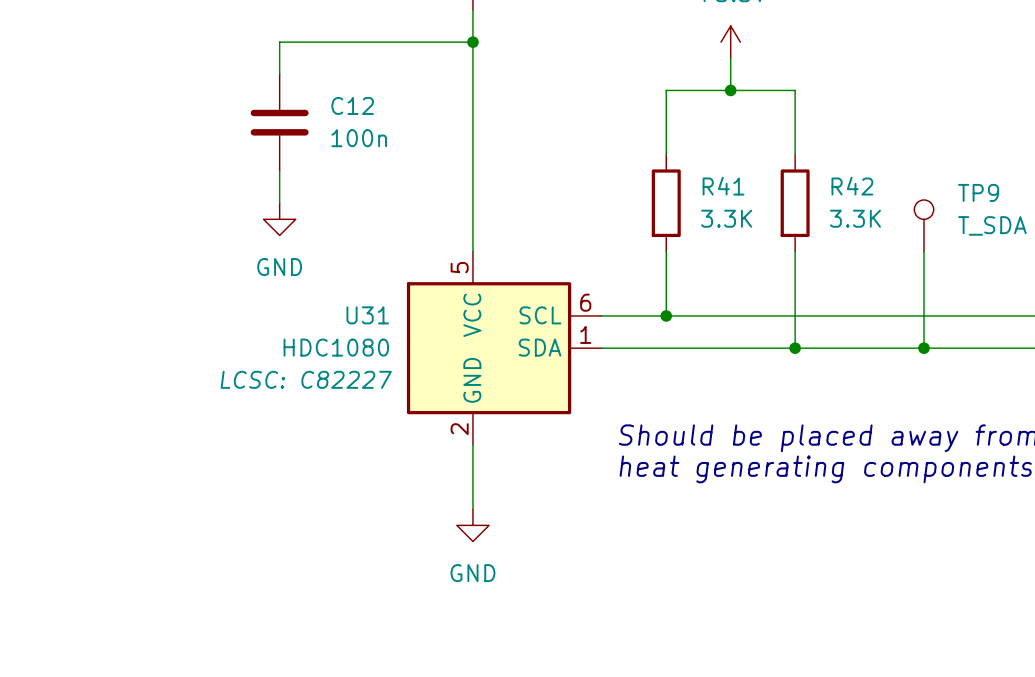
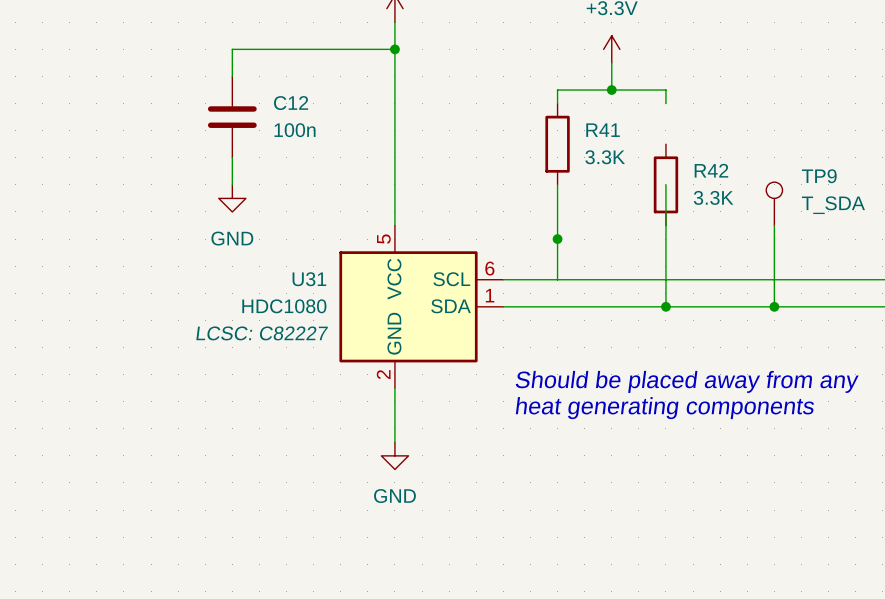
wire: (666, 106) (666, 154) -> (557, 184) (557, 225)
wire: (795, 106) (795, 154) -> (665, 184) (665, 225)
R41 position: (666, 203) -> (557, 144)
junction position: (666, 315) -> (557, 239)

